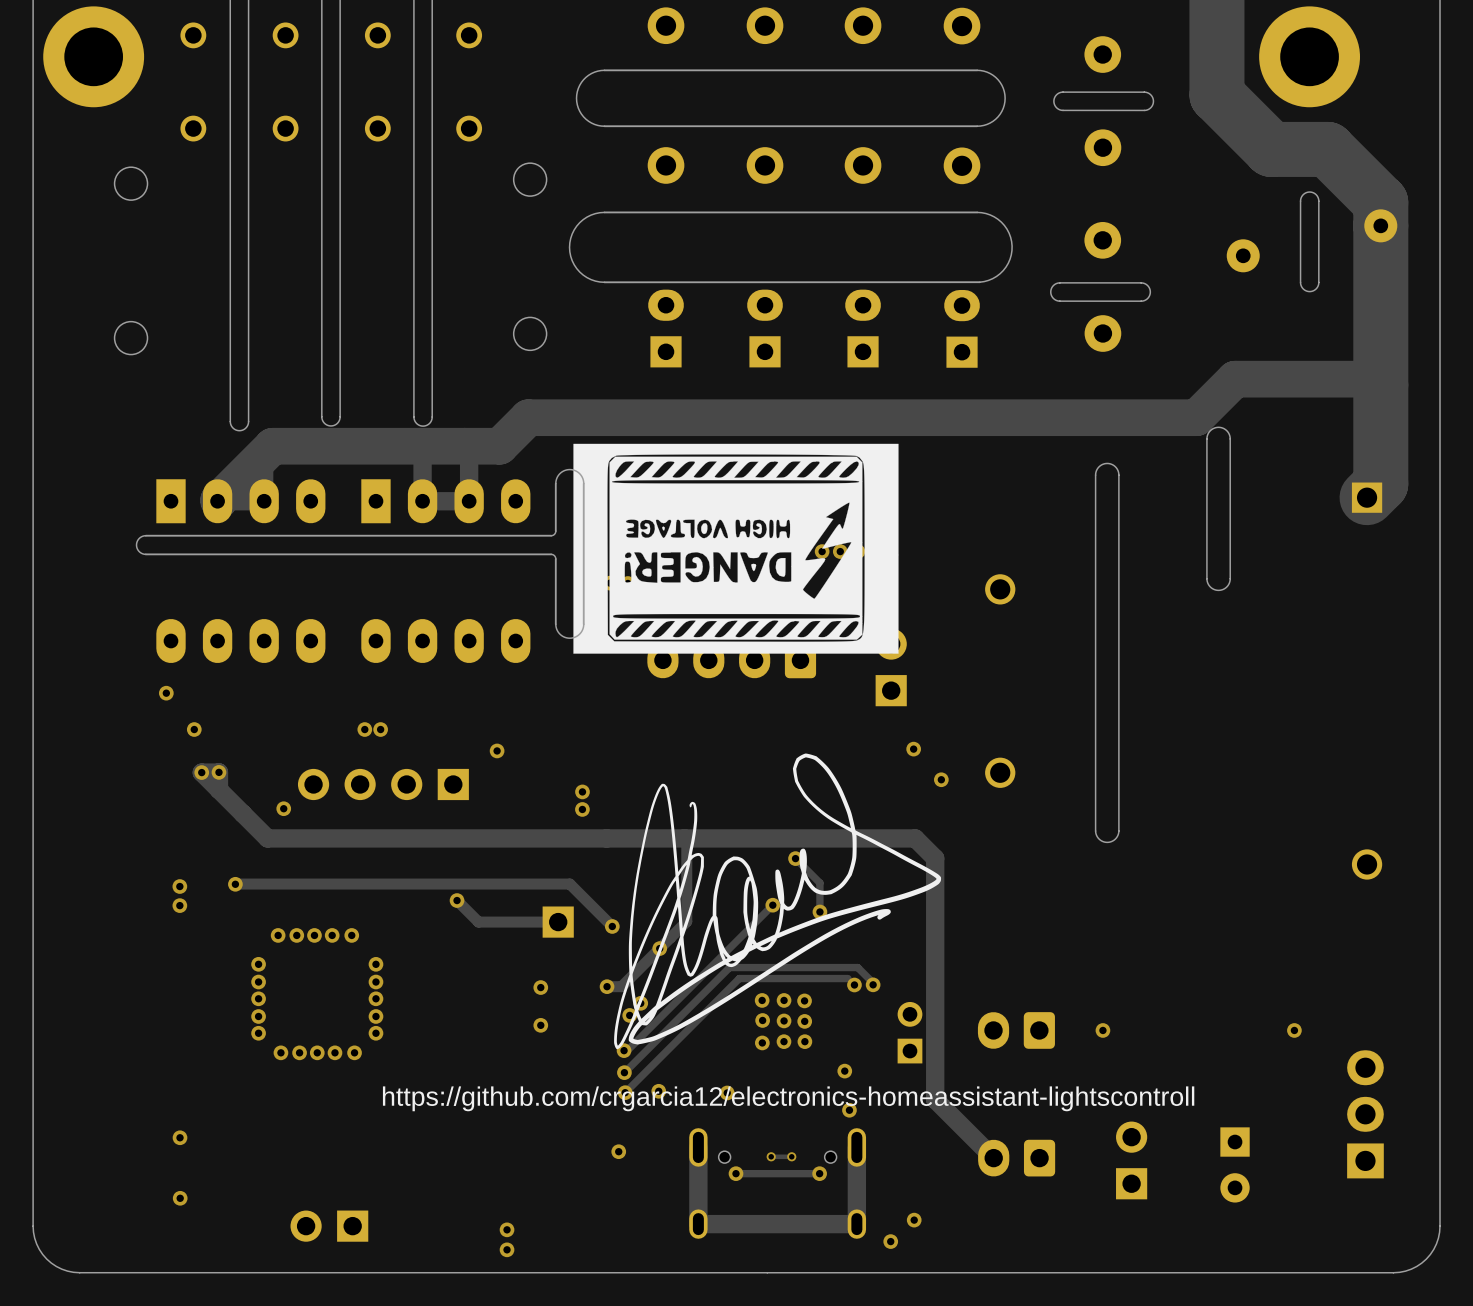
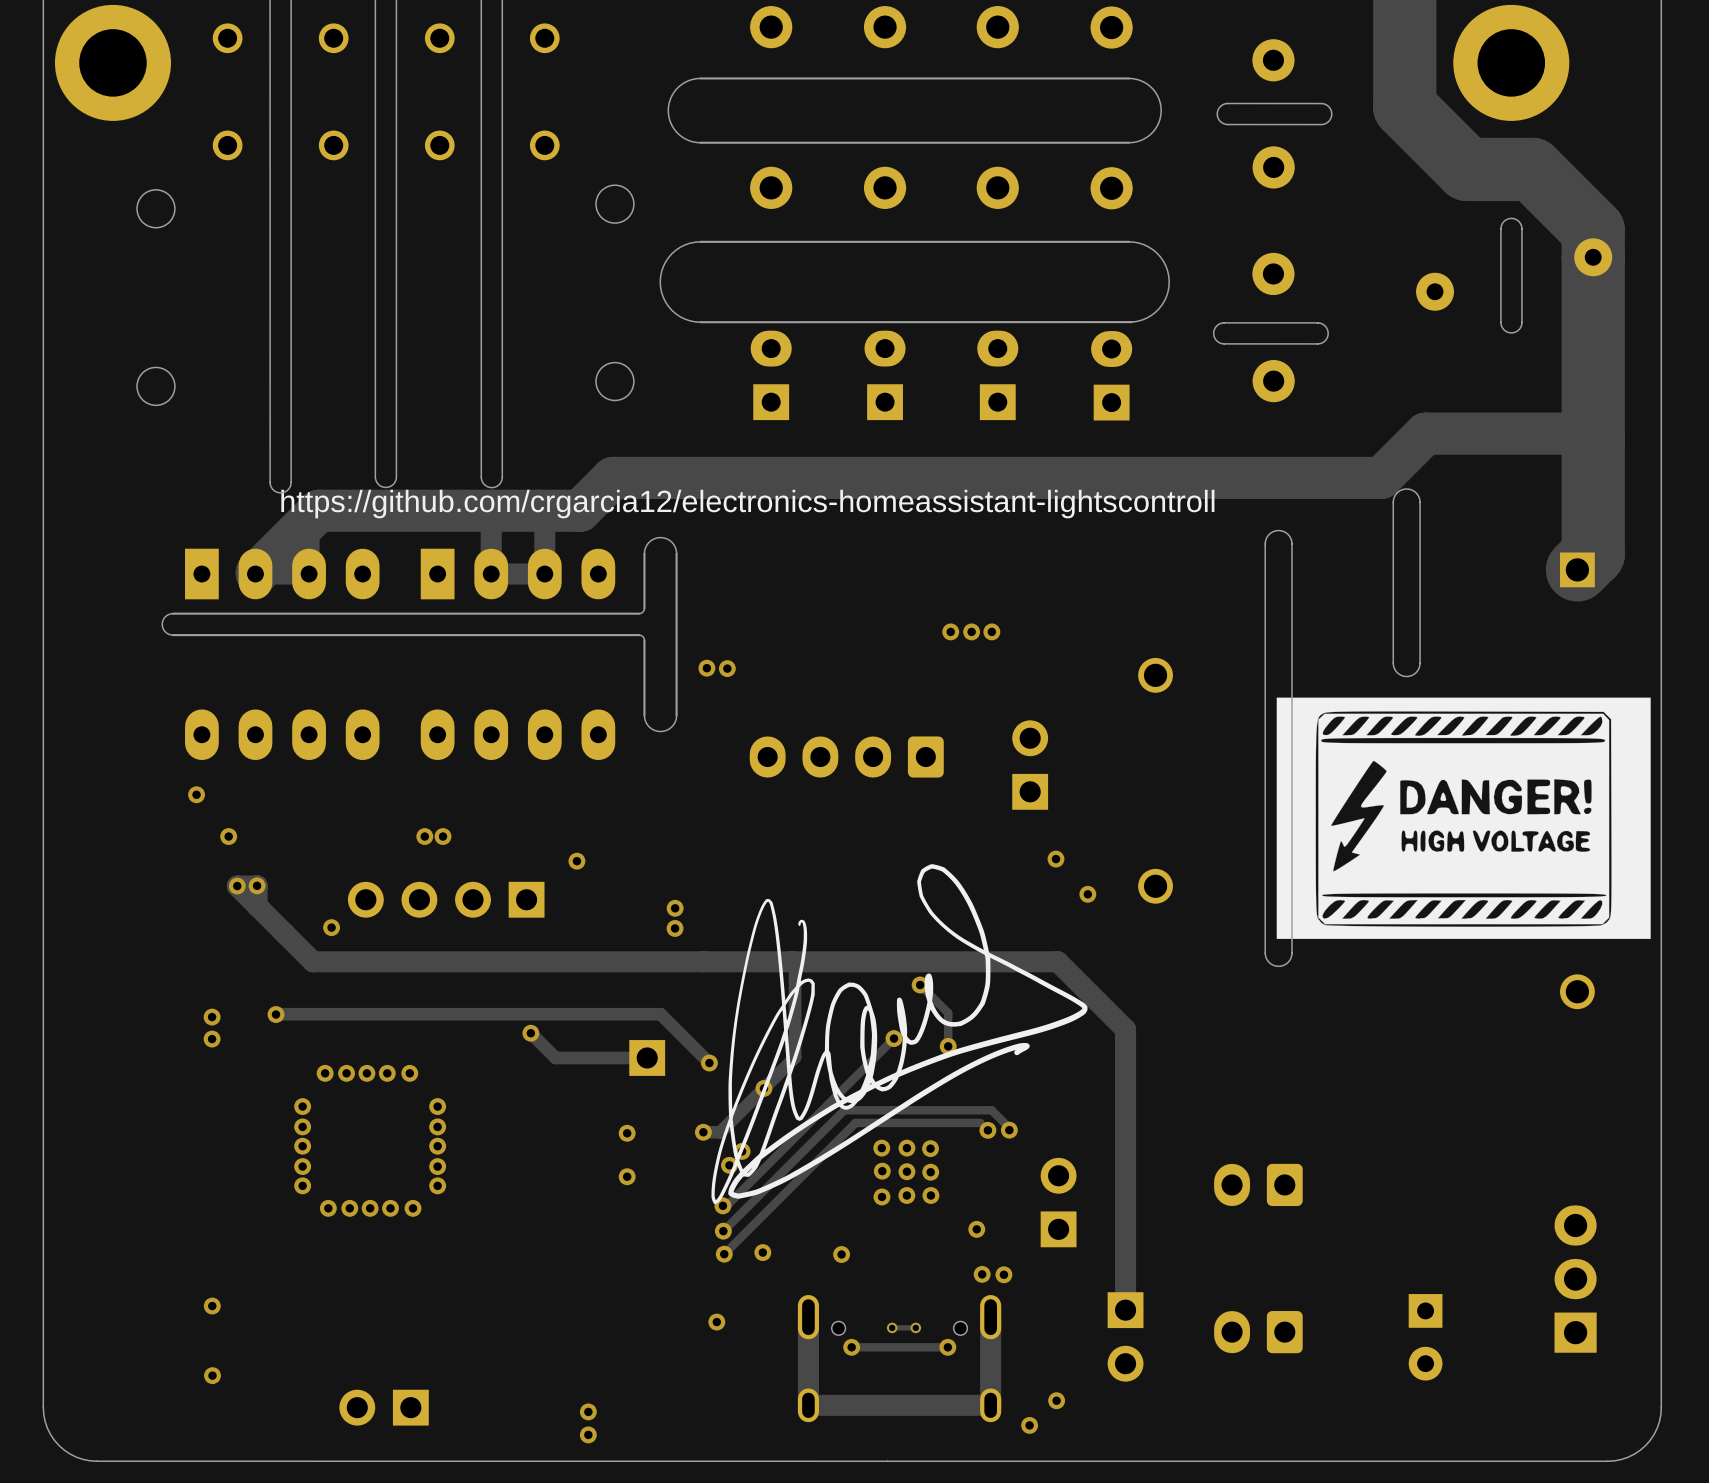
text: none -> https://github.com/crgarcia12/electronics-homeassistant-lightscontroll (747, 504)
drawing: [573, 443, 899, 654] -> none
drawing: none -> [1276, 697, 1651, 939]
track: (935, 858) (935, 1099) (993, 1158) -> (1080, 984) (1125, 1029) (1125, 1310)
part footprint: [897, 1001, 923, 1064] -> [1040, 1157, 1077, 1248]
part: (1016, 1030) -> none
via: (1102, 1030) -> none
via: (1294, 1030) -> none
part: none -> (1258, 1184)
text: https://github.com/crgarcia12/electronics-homeassistant-lightscontroll (788, 1098) -> none
via: none -> (1003, 1274)
part: (1016, 1158) -> none
part: none -> (1258, 1332)
part rotation: 0° (1131, 1160) -> 180° (1125, 1336)
part position: (1131, 1160) -> (1125, 1336)

